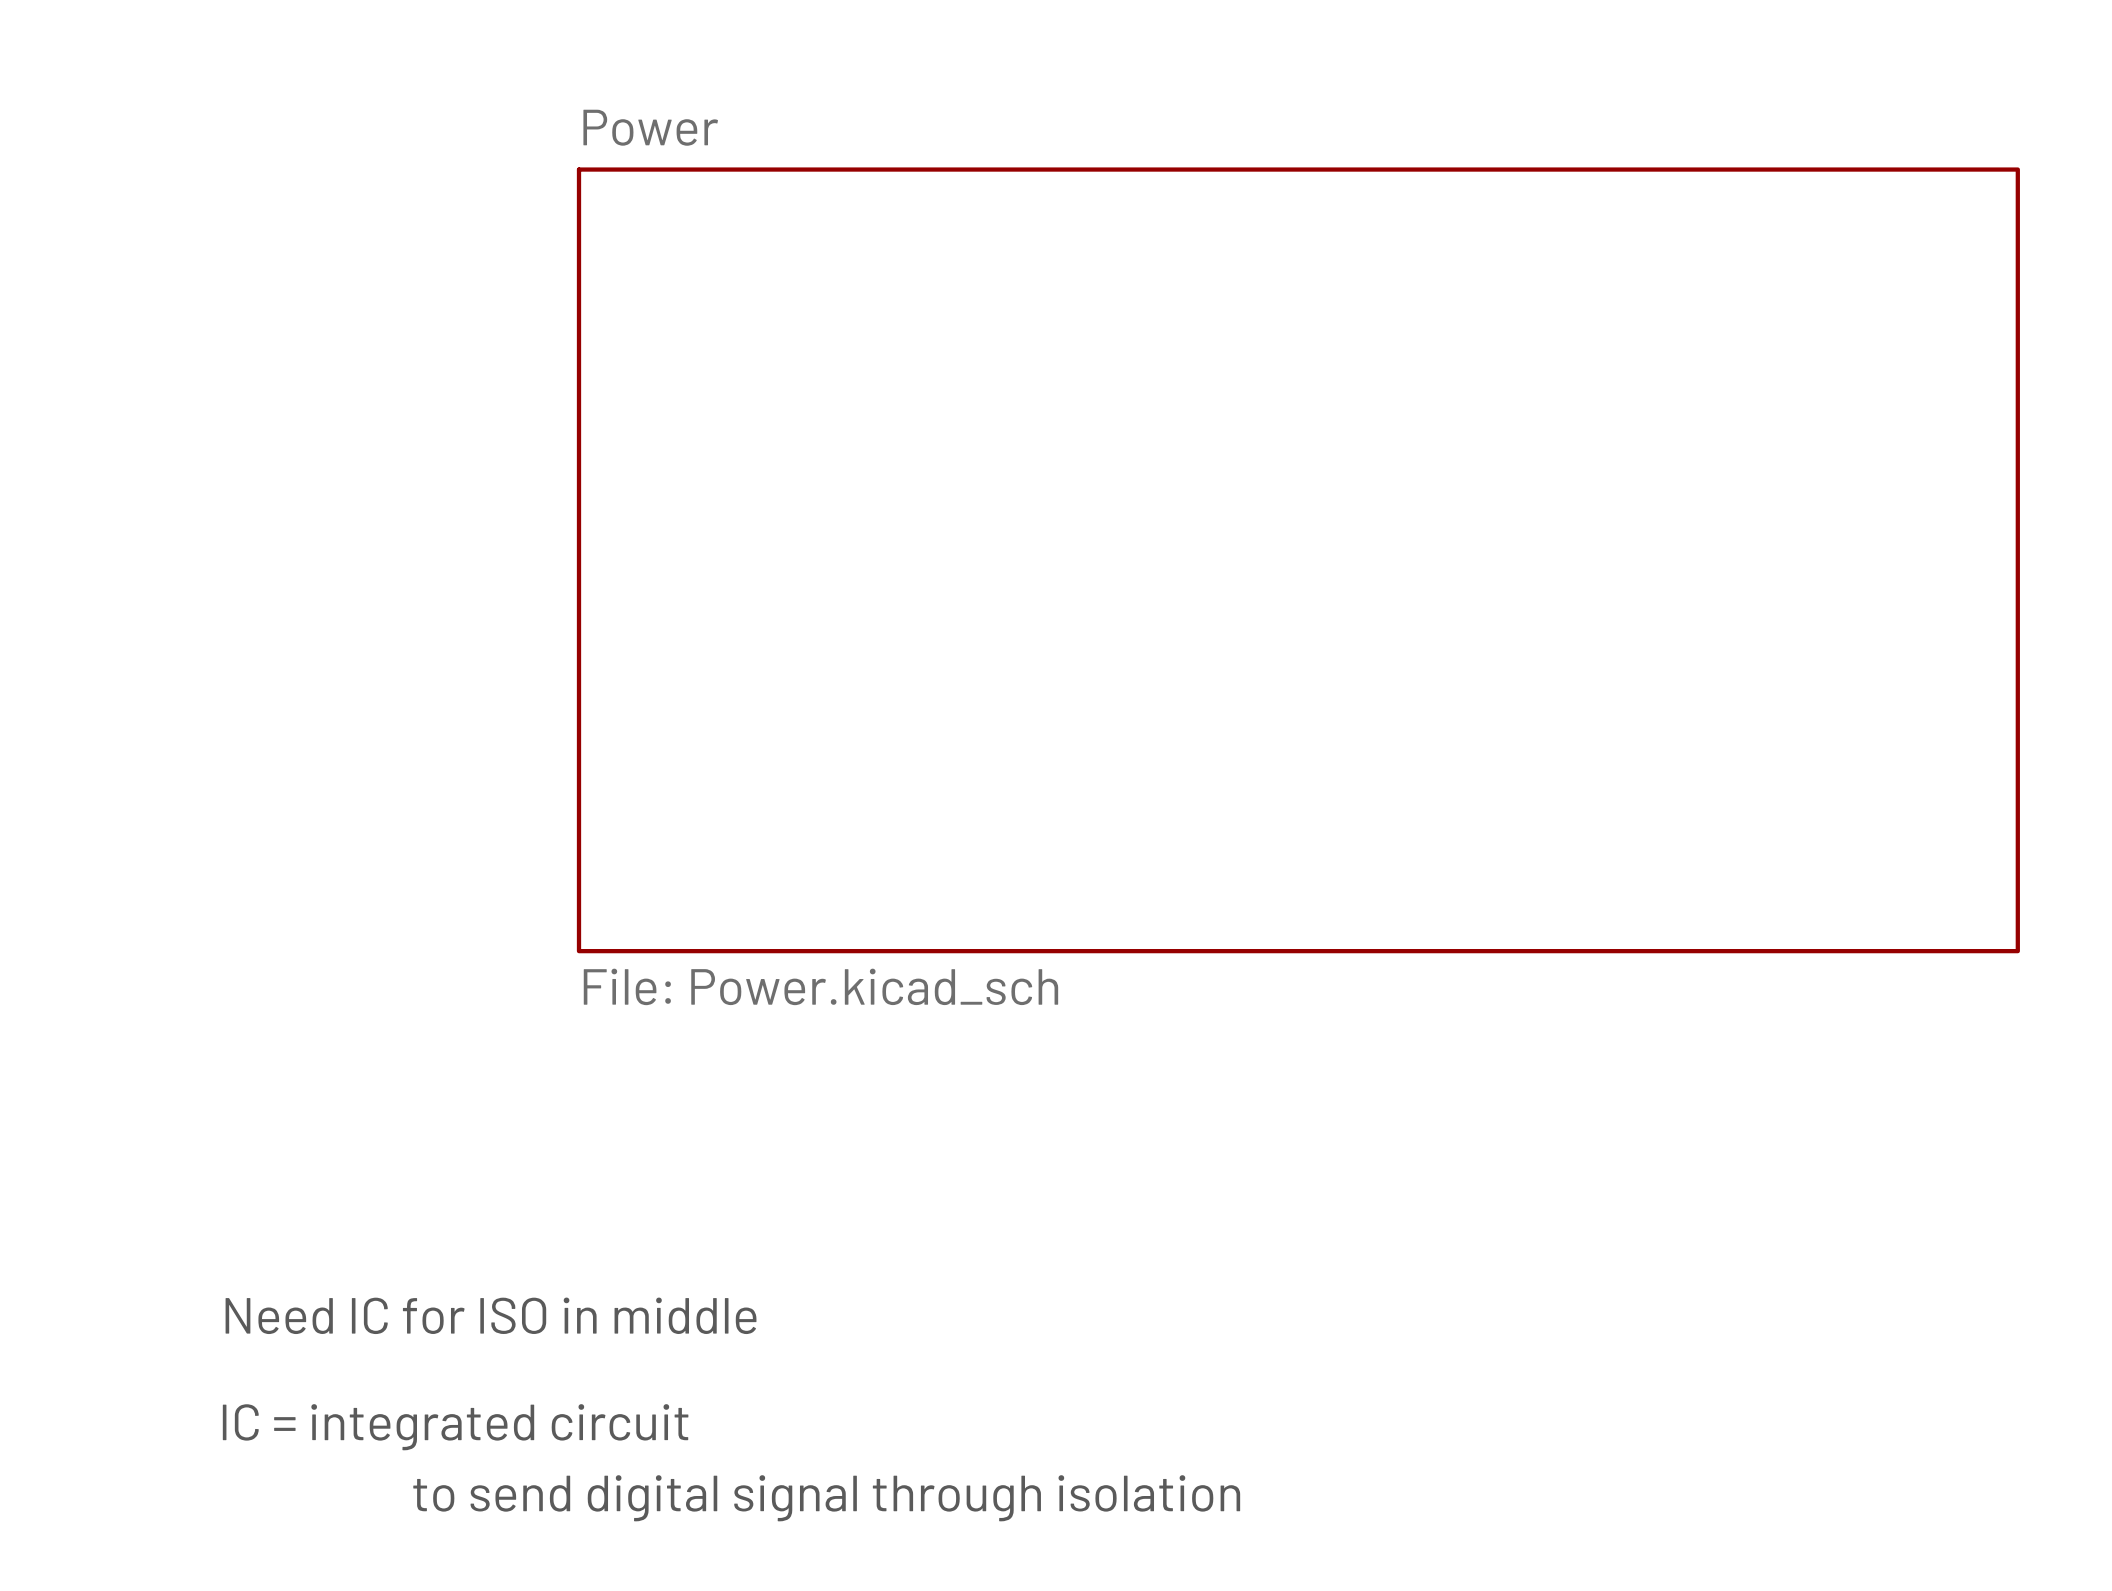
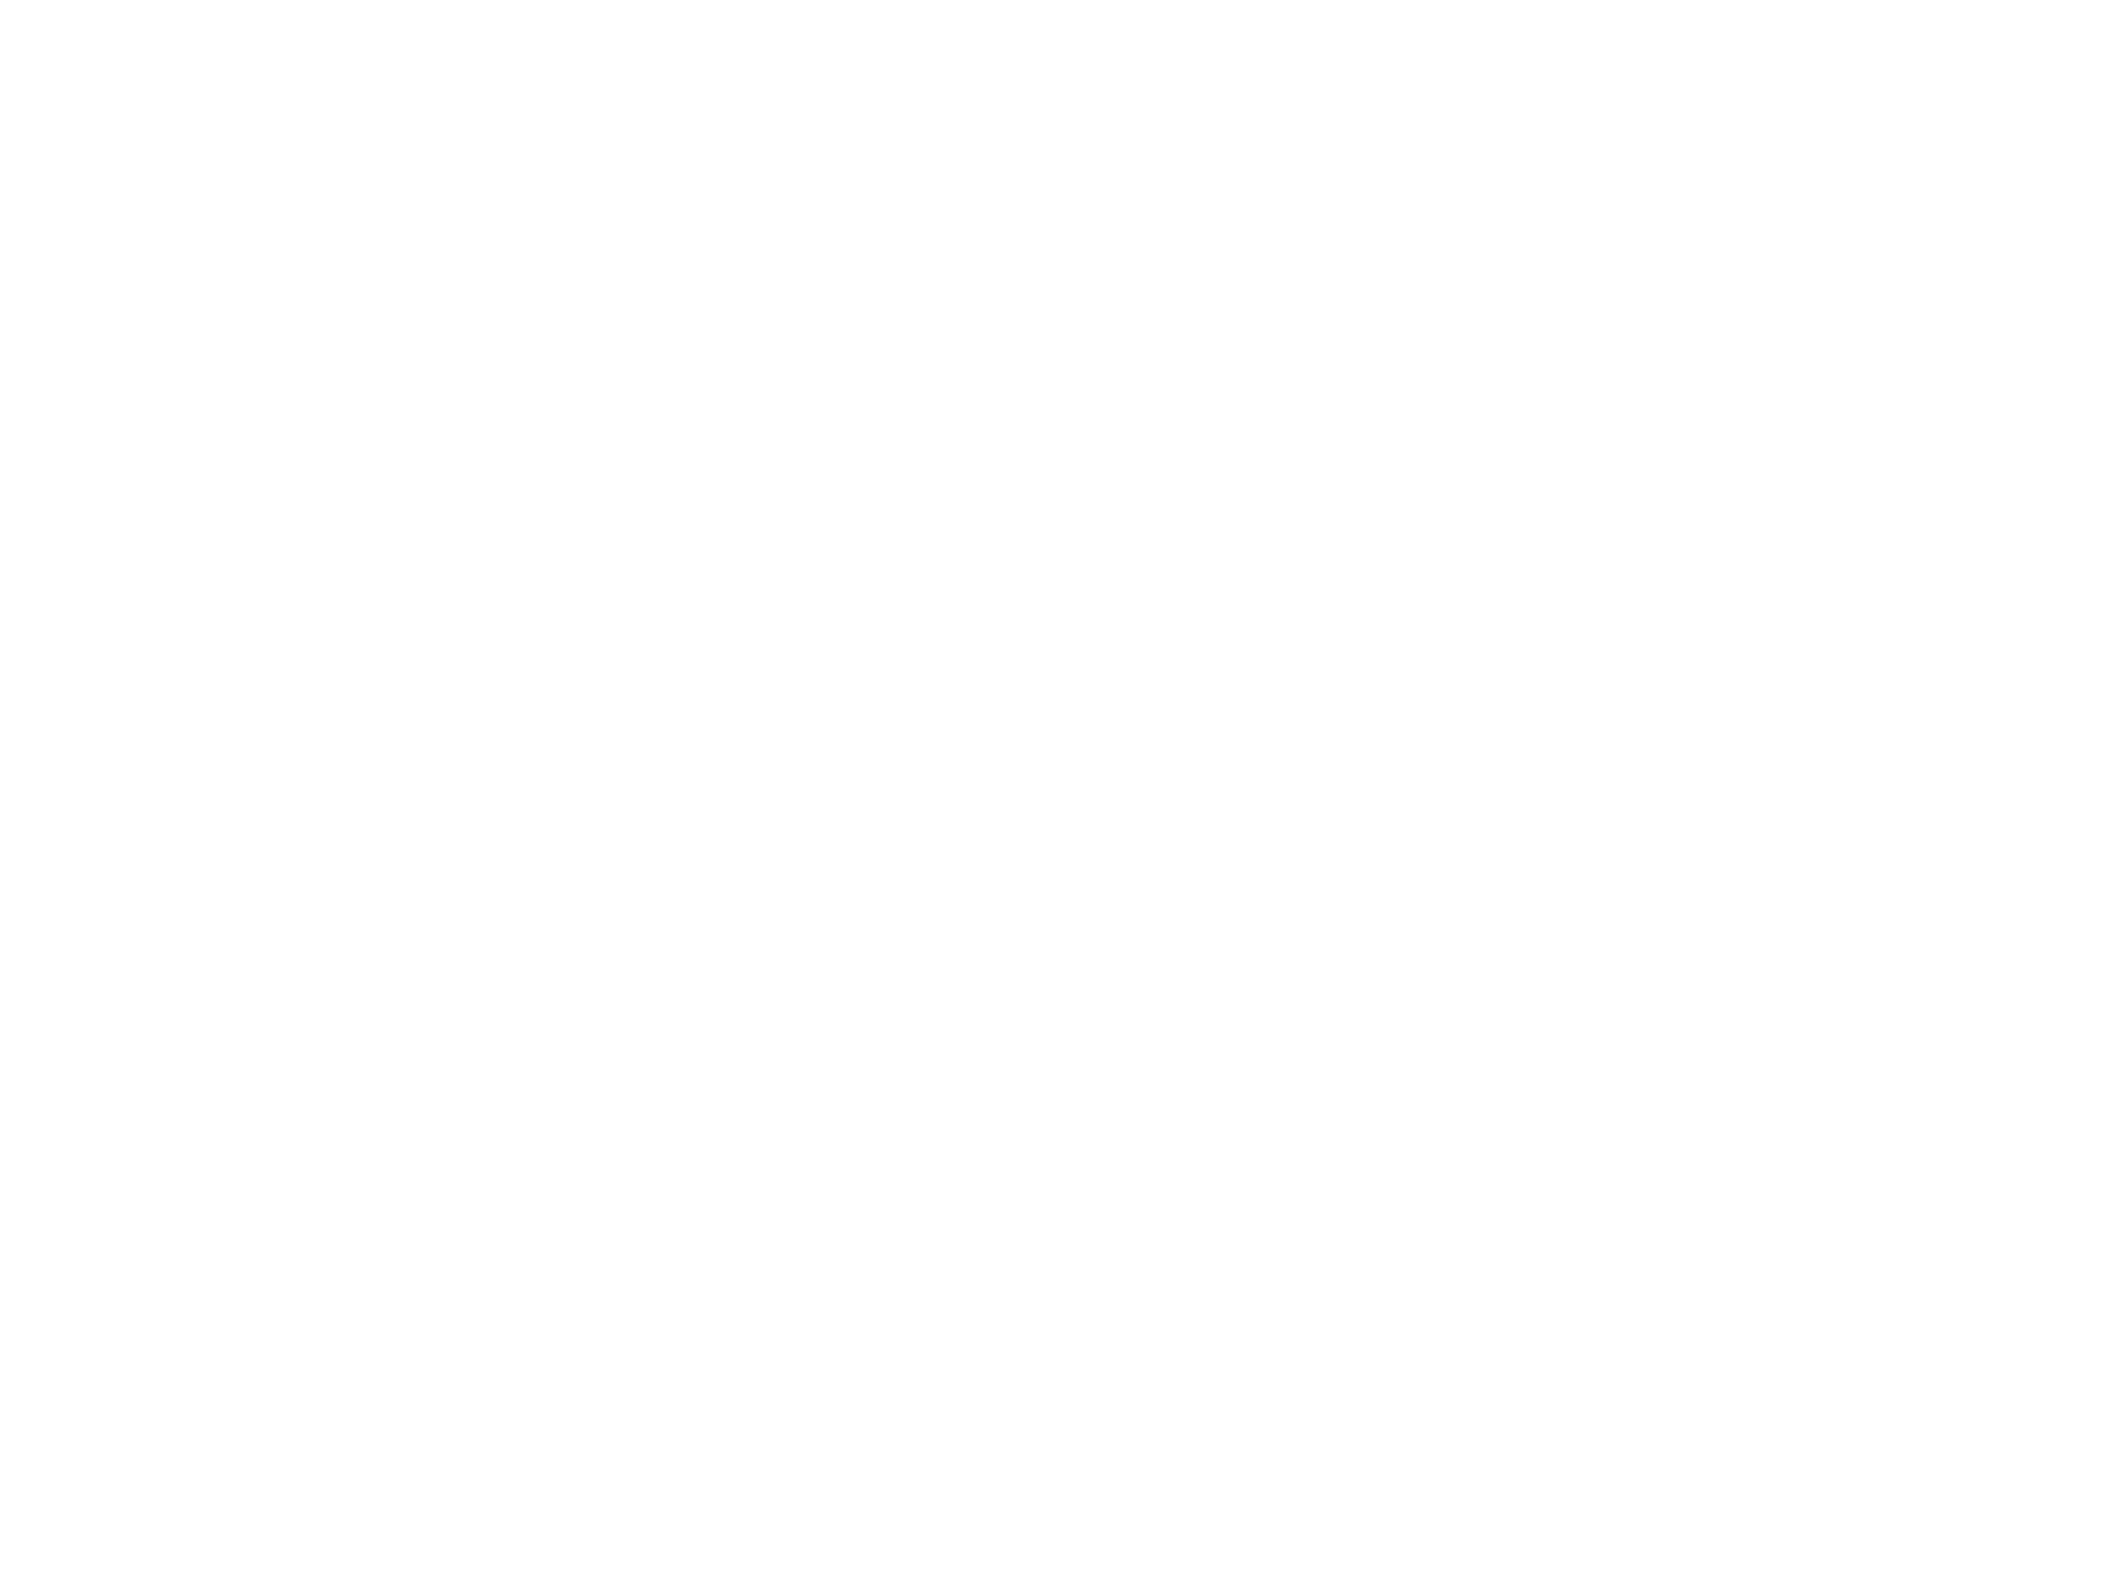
sheet Power: File: Power.kicad_sch (1298, 560) -> none
text: Need IC for ISO in middle (491, 1315) -> none
text: IC = integrated circuit (455, 1427) -> none
text: to send digital signal through isolation (826, 1498) -> none

